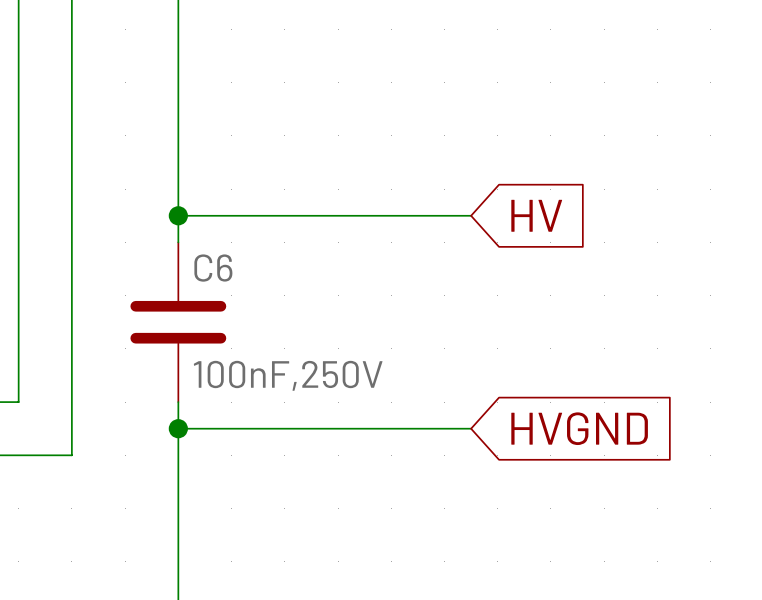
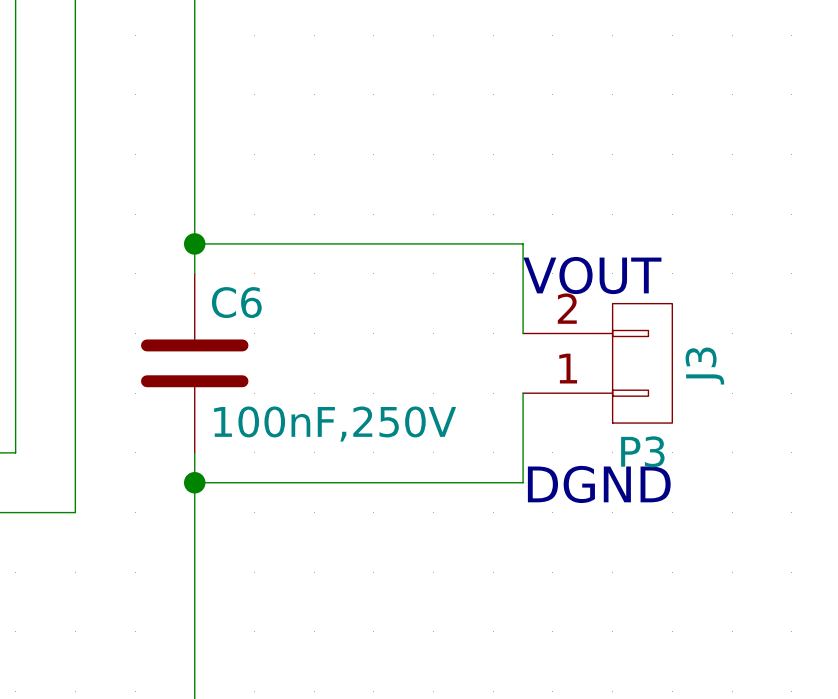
wire: none -> (523, 243) (523, 333)
global label: HV (536, 215) -> none
text: none -> VOUT (592, 275)
P3: none -> J3 (597, 363)
wire: none -> (523, 393) (523, 482)
global label: HVGND (579, 428) -> none
text: none -> DGND (599, 484)

